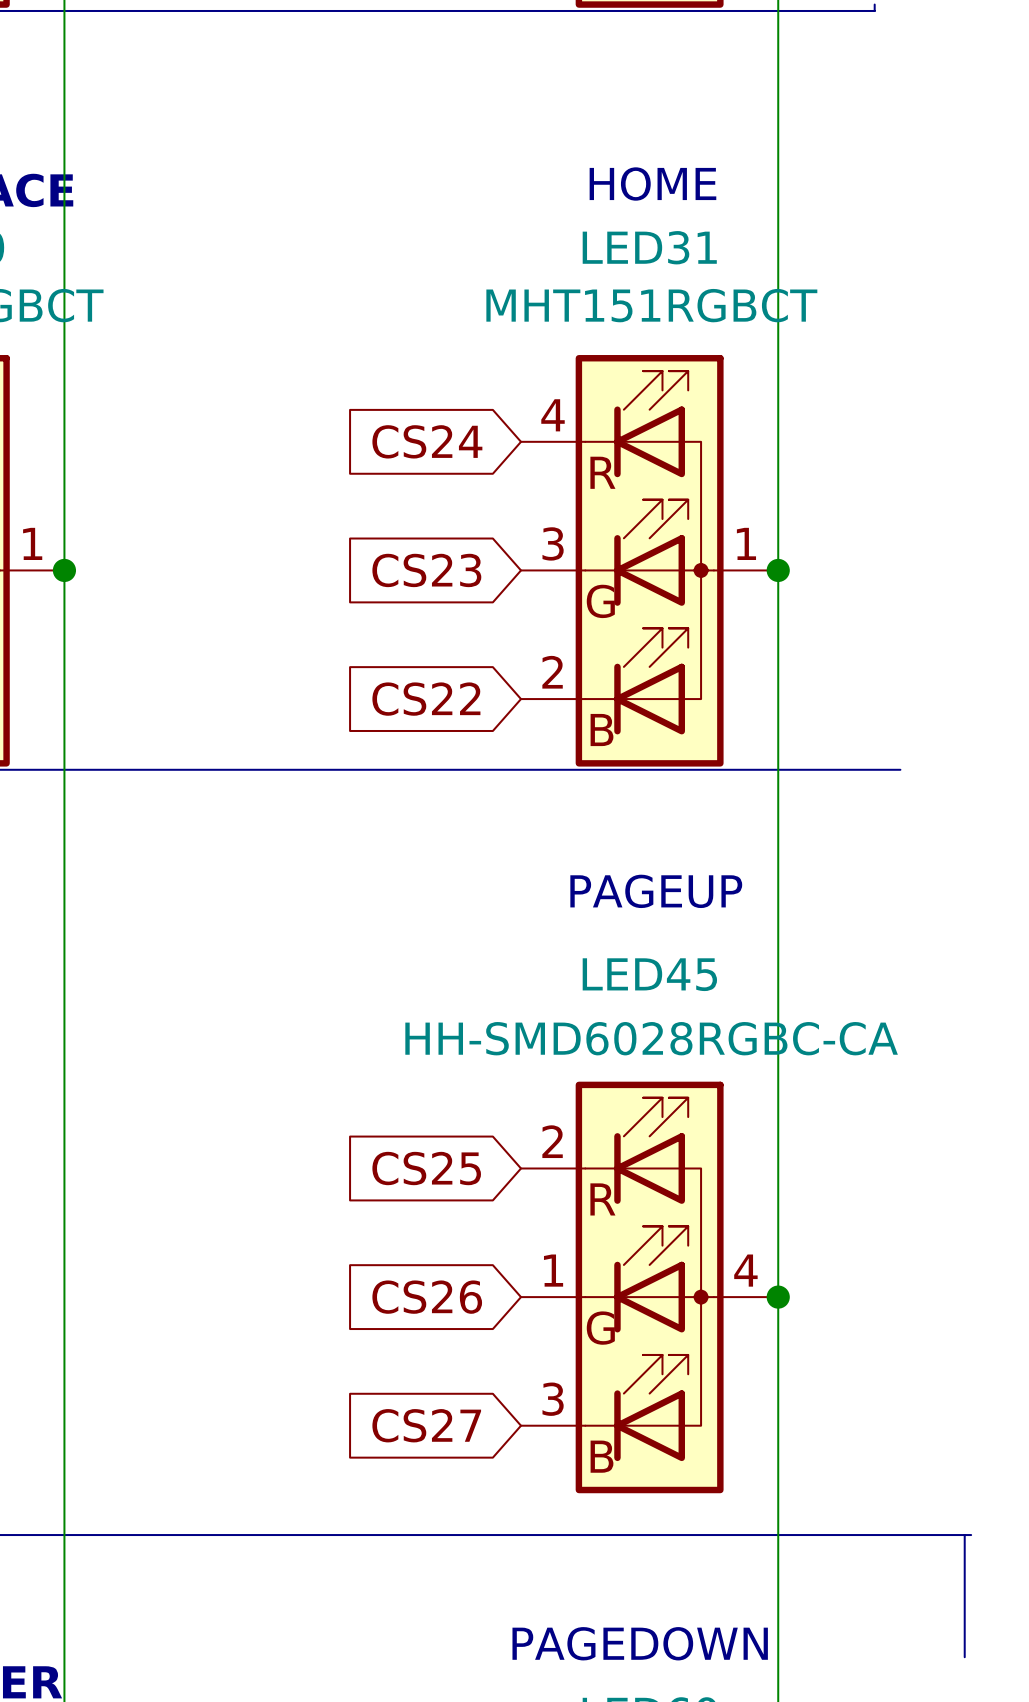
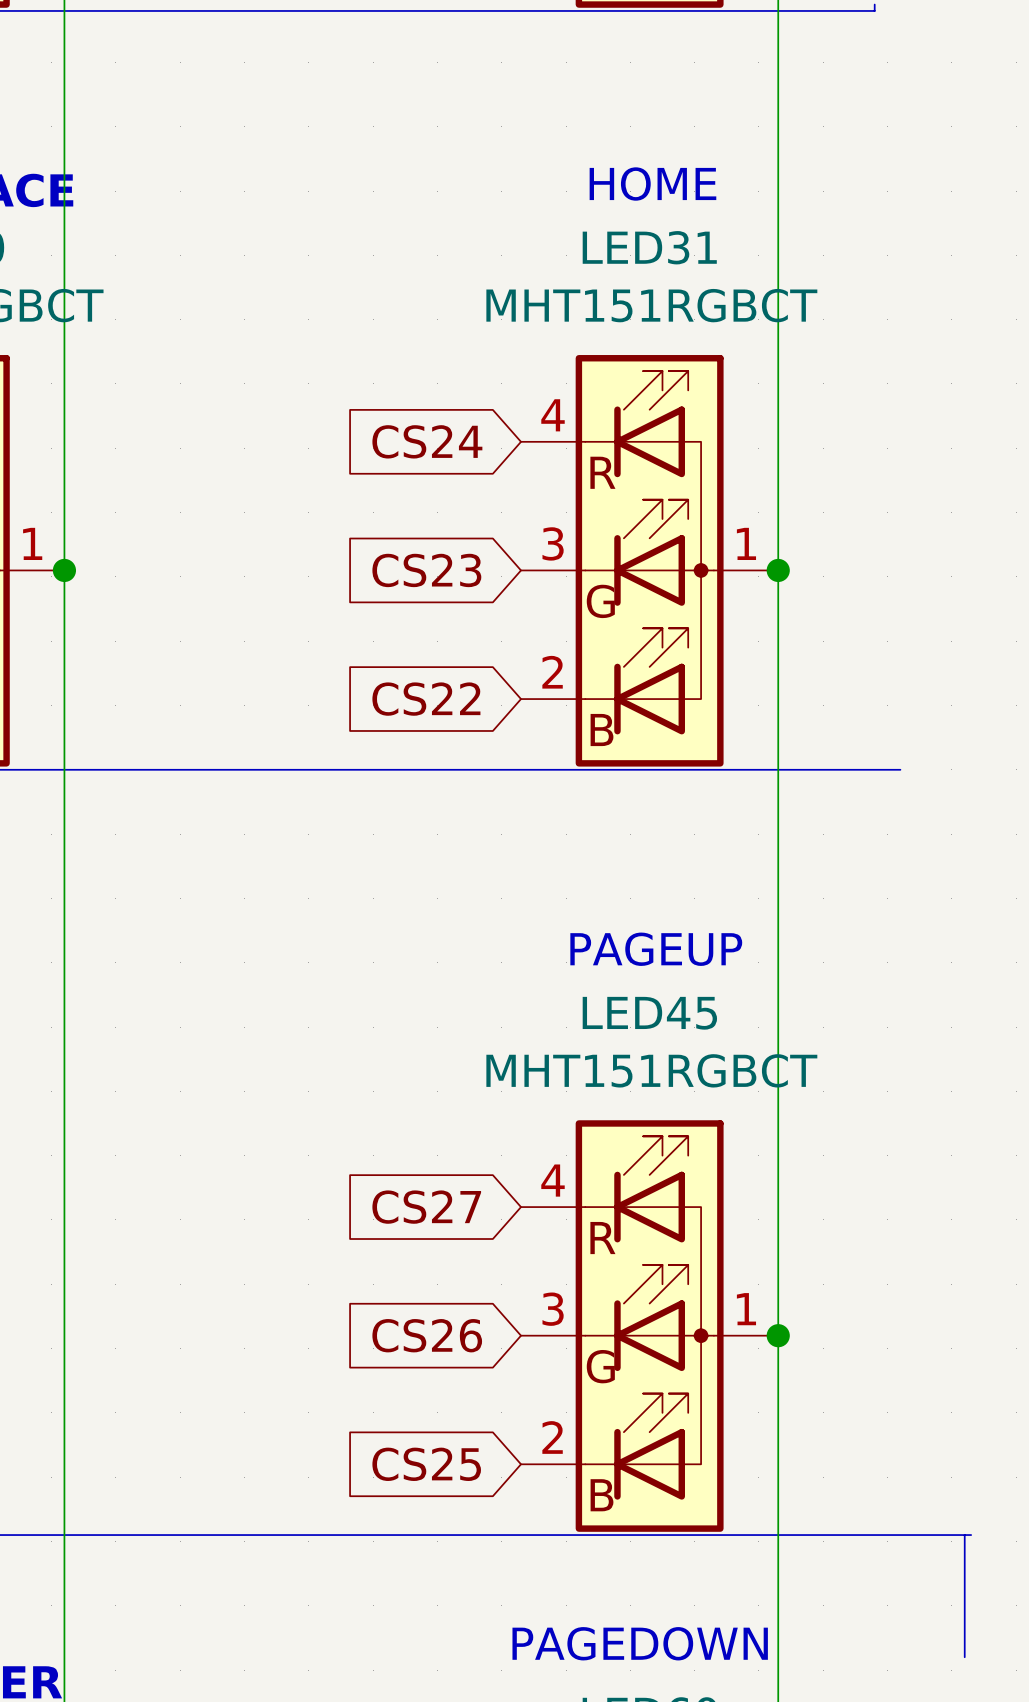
text position: PAGEUP (656, 891) -> PAGEUP (656, 949)
LED45 value: HH-SMD6028RGBC-CA (651, 1038) -> MHT151RGBCT (651, 1070)
LED45 pin number: 2 (552, 1141) -> 4 (553, 1180)
global label position: CS25 (426, 1168) -> CS25 (426, 1464)
LED45 pin number: 1 (553, 1270) -> 3 (553, 1309)
LED45 pin number: 4 (745, 1270) -> 1 (746, 1309)
LED45 position: (649, 1287) -> (649, 1326)
global label position: CS26 (427, 1297) -> CS26 (427, 1335)
junction position: (778, 1297) -> (778, 1335)
LED45 pin number: 3 (553, 1399) -> 2 (552, 1437)
global label position: CS27 (426, 1425) -> CS27 (426, 1207)

